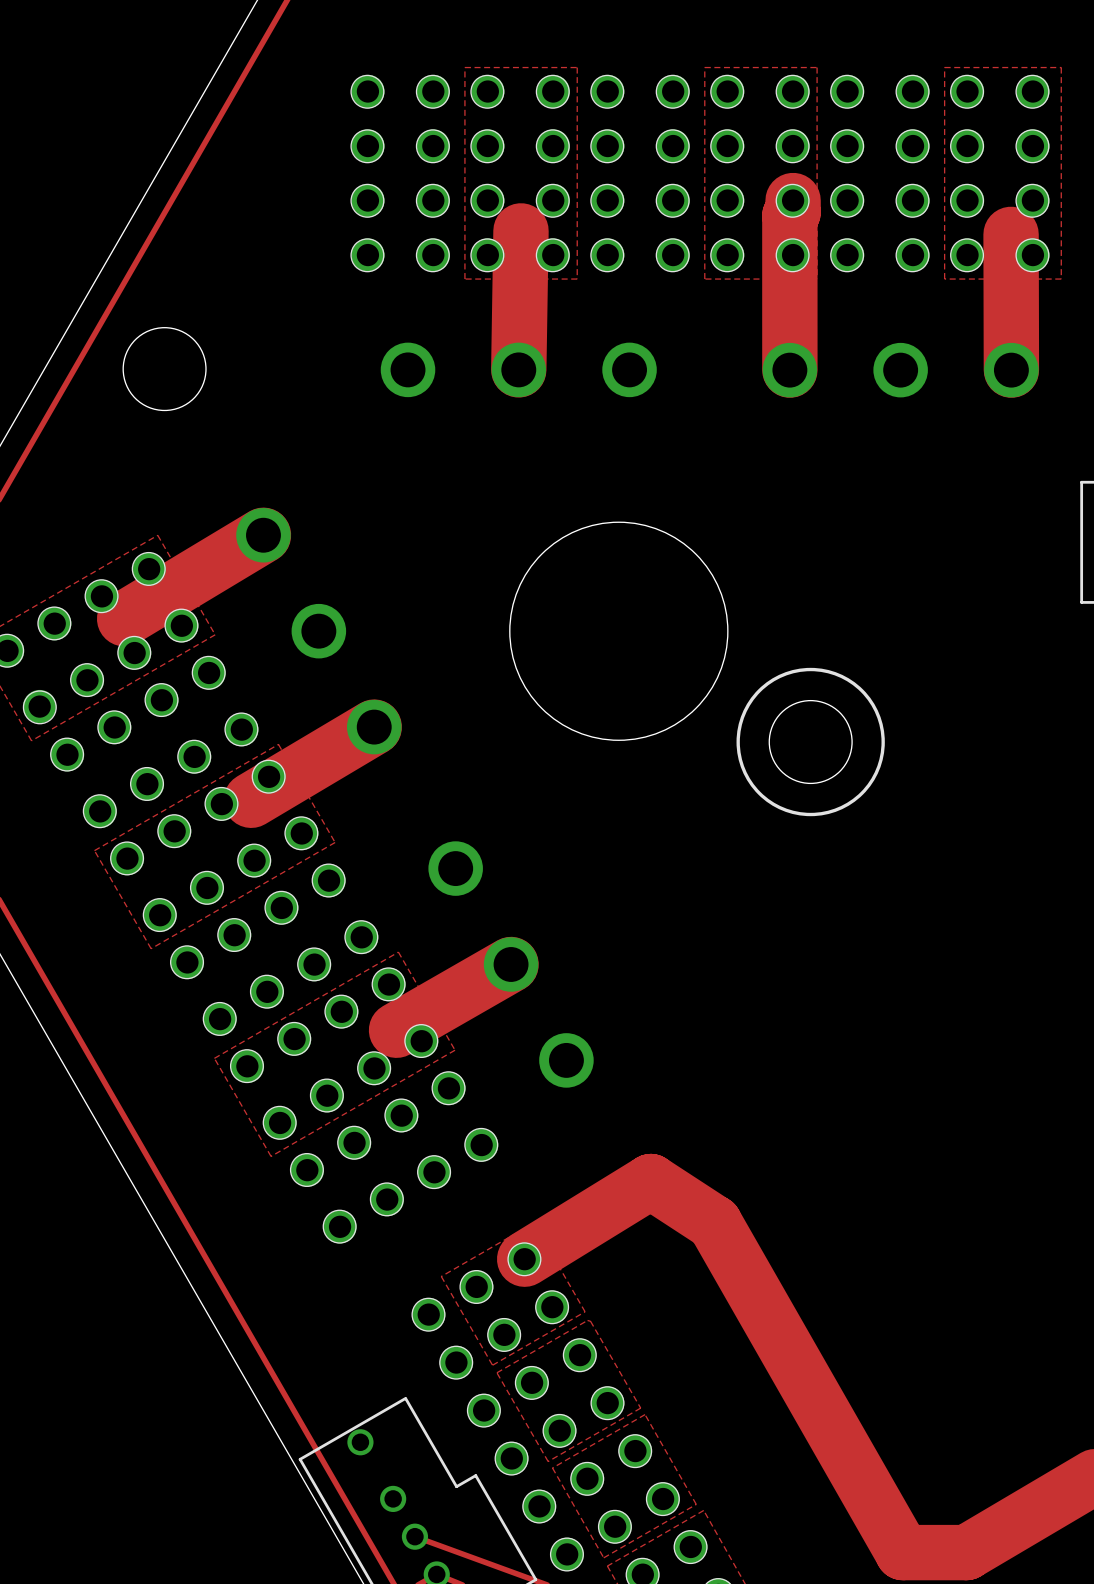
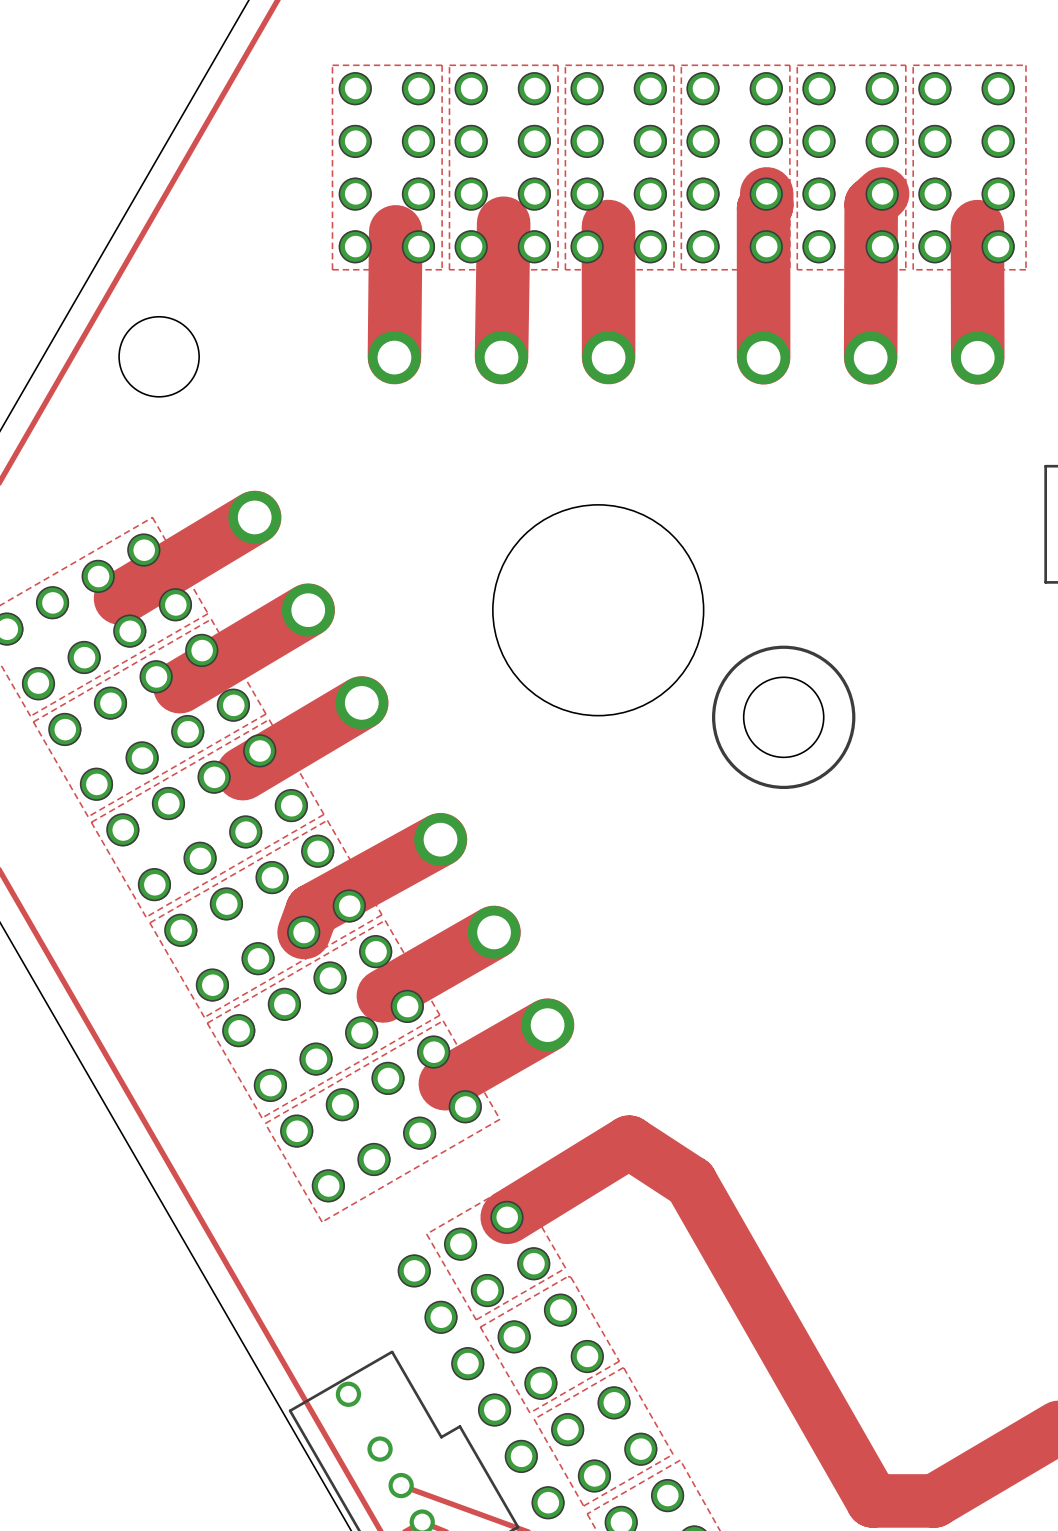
zone outline: none -> (332, 65) (442, 65) (442, 269) (332, 269) (332, 65)
zone outline: none -> (565, 65) (673, 65) (673, 269) (565, 269) (565, 65)
zone outline: none -> (797, 65) (905, 65) (905, 269) (797, 269) (797, 65)
track: none -> (882, 193) (871, 204) (870, 357)
track: none -> (608, 226) (608, 357)
track: none -> (395, 231) (394, 357)
track: none -> (308, 610) (179, 686)
zone outline: none -> (211, 619) (266, 714) (88, 816) (33, 721) (211, 619)
zone outline: none -> (327, 820) (381, 914) (204, 1017) (149, 922) (327, 820)
track: none -> (440, 839) (312, 910) (304, 932)
zone outline: none -> (443, 1020) (499, 1119) (322, 1222) (265, 1123) (443, 1020)
track: none -> (547, 1025) (445, 1083)

